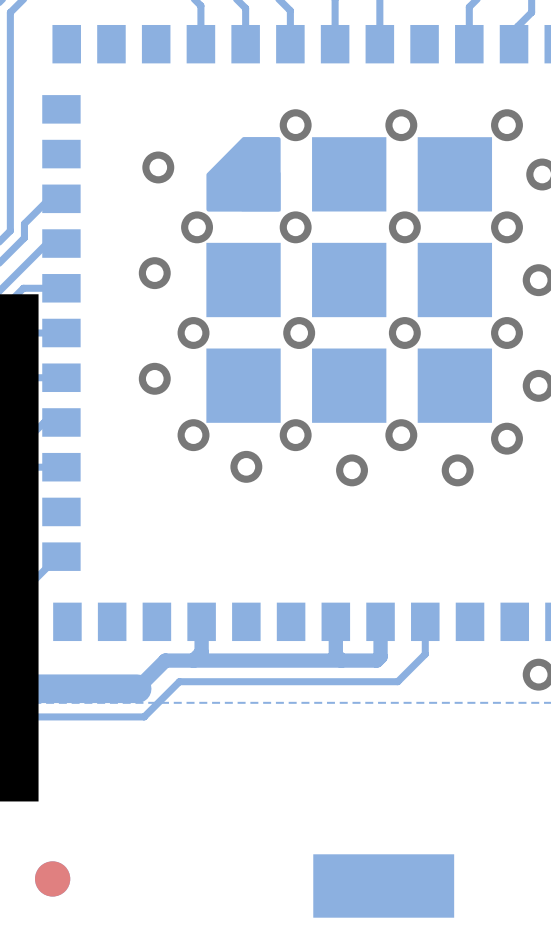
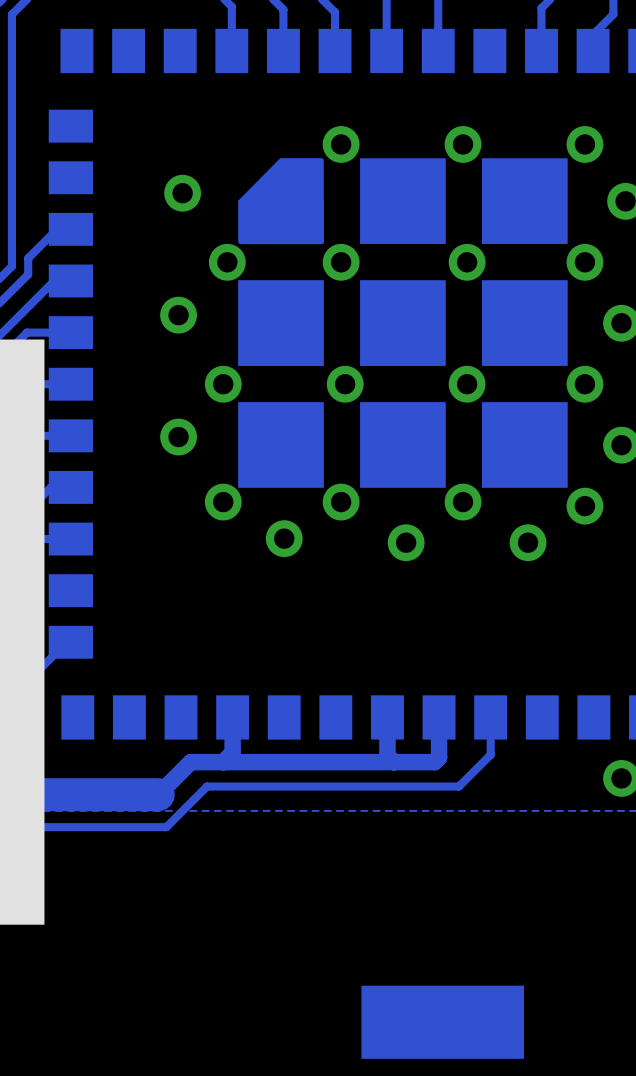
part: (52, 878) -> none

